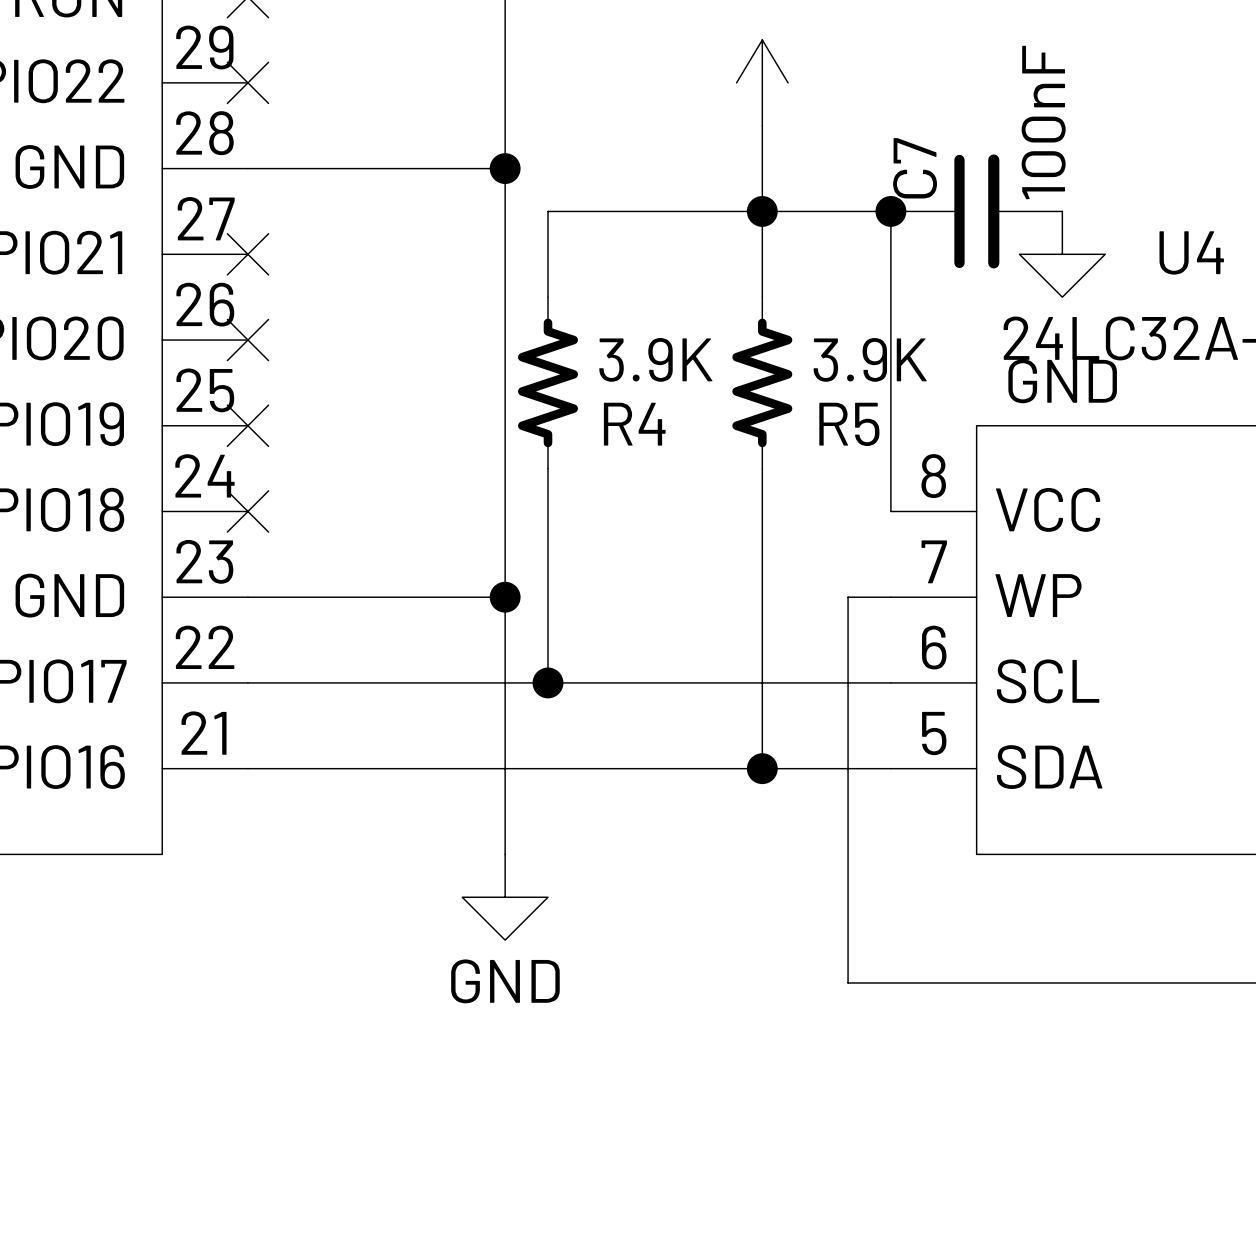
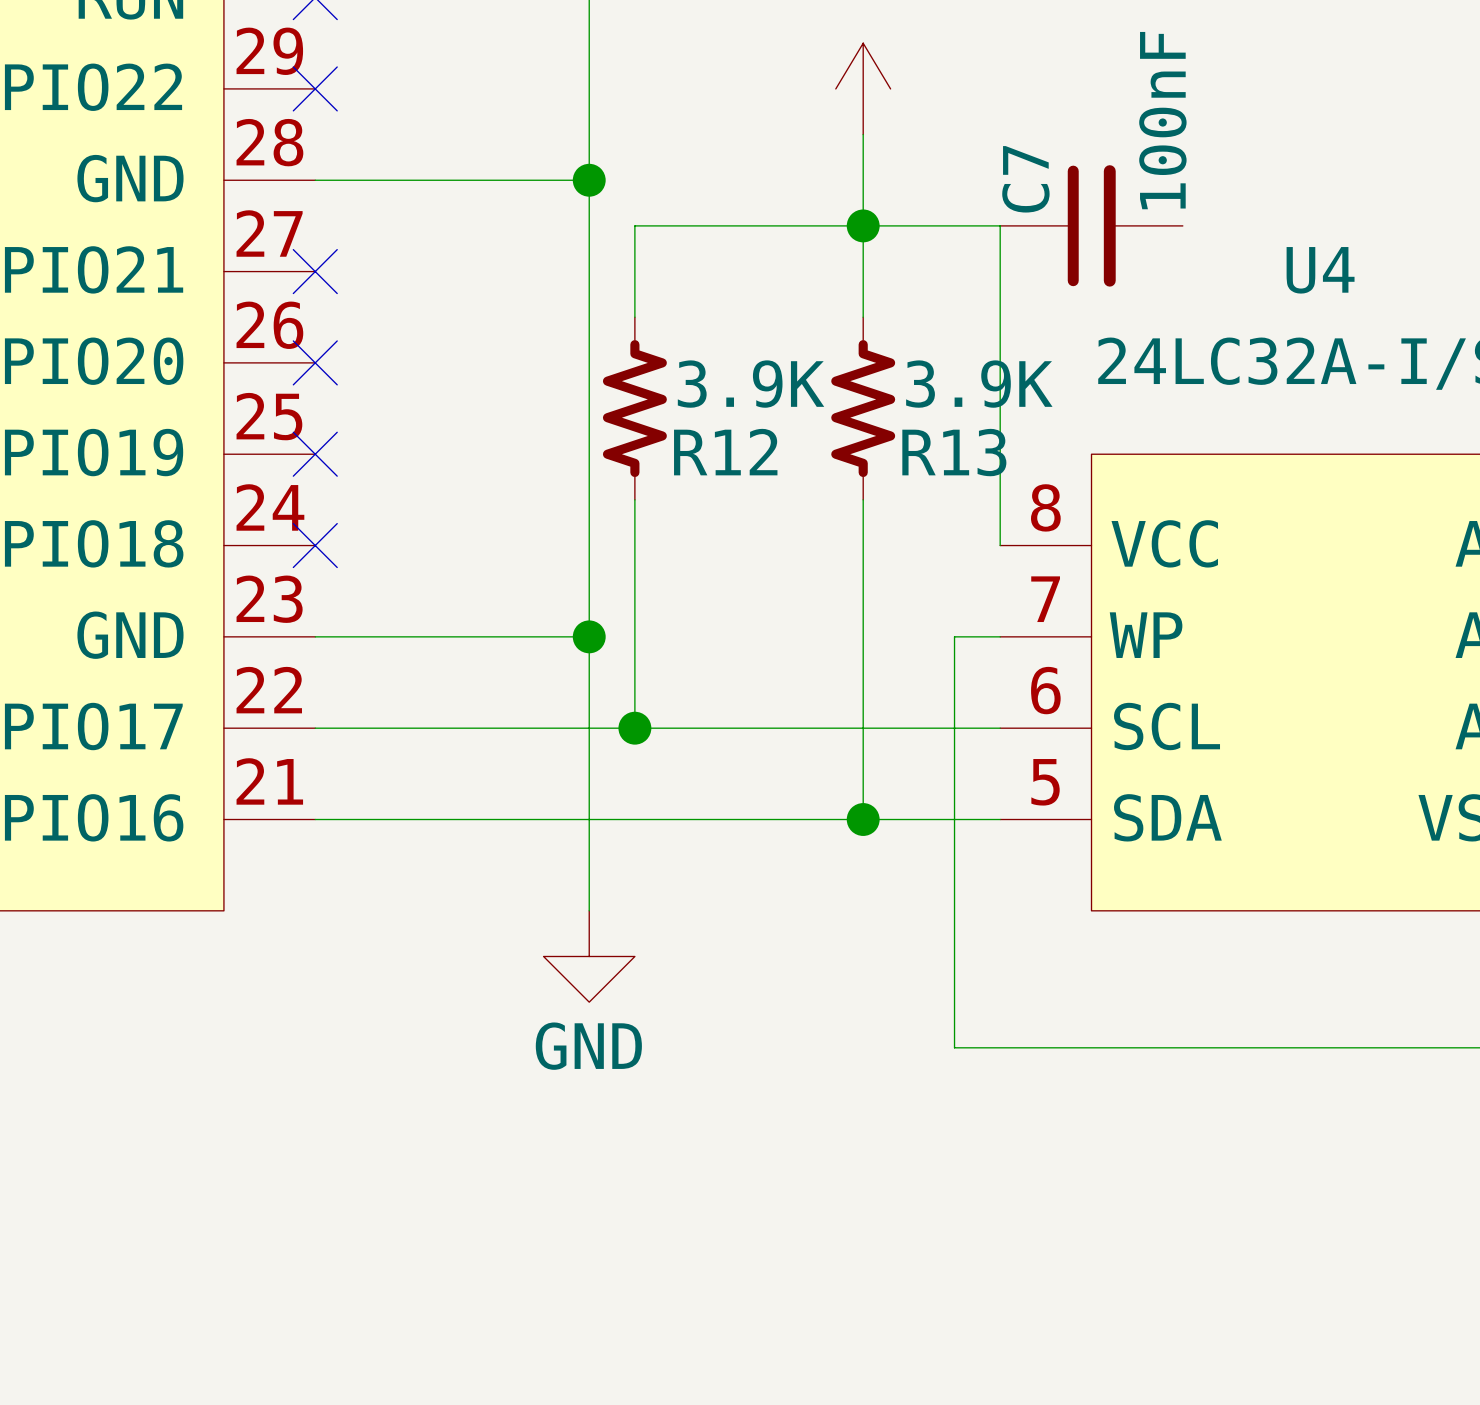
junction: (890, 211) -> none
power symbol: GND (1062, 254) -> none
R4 name: R4 (634, 424) -> R12 (725, 452)
R5 name: R5 (849, 424) -> R13 (954, 452)

